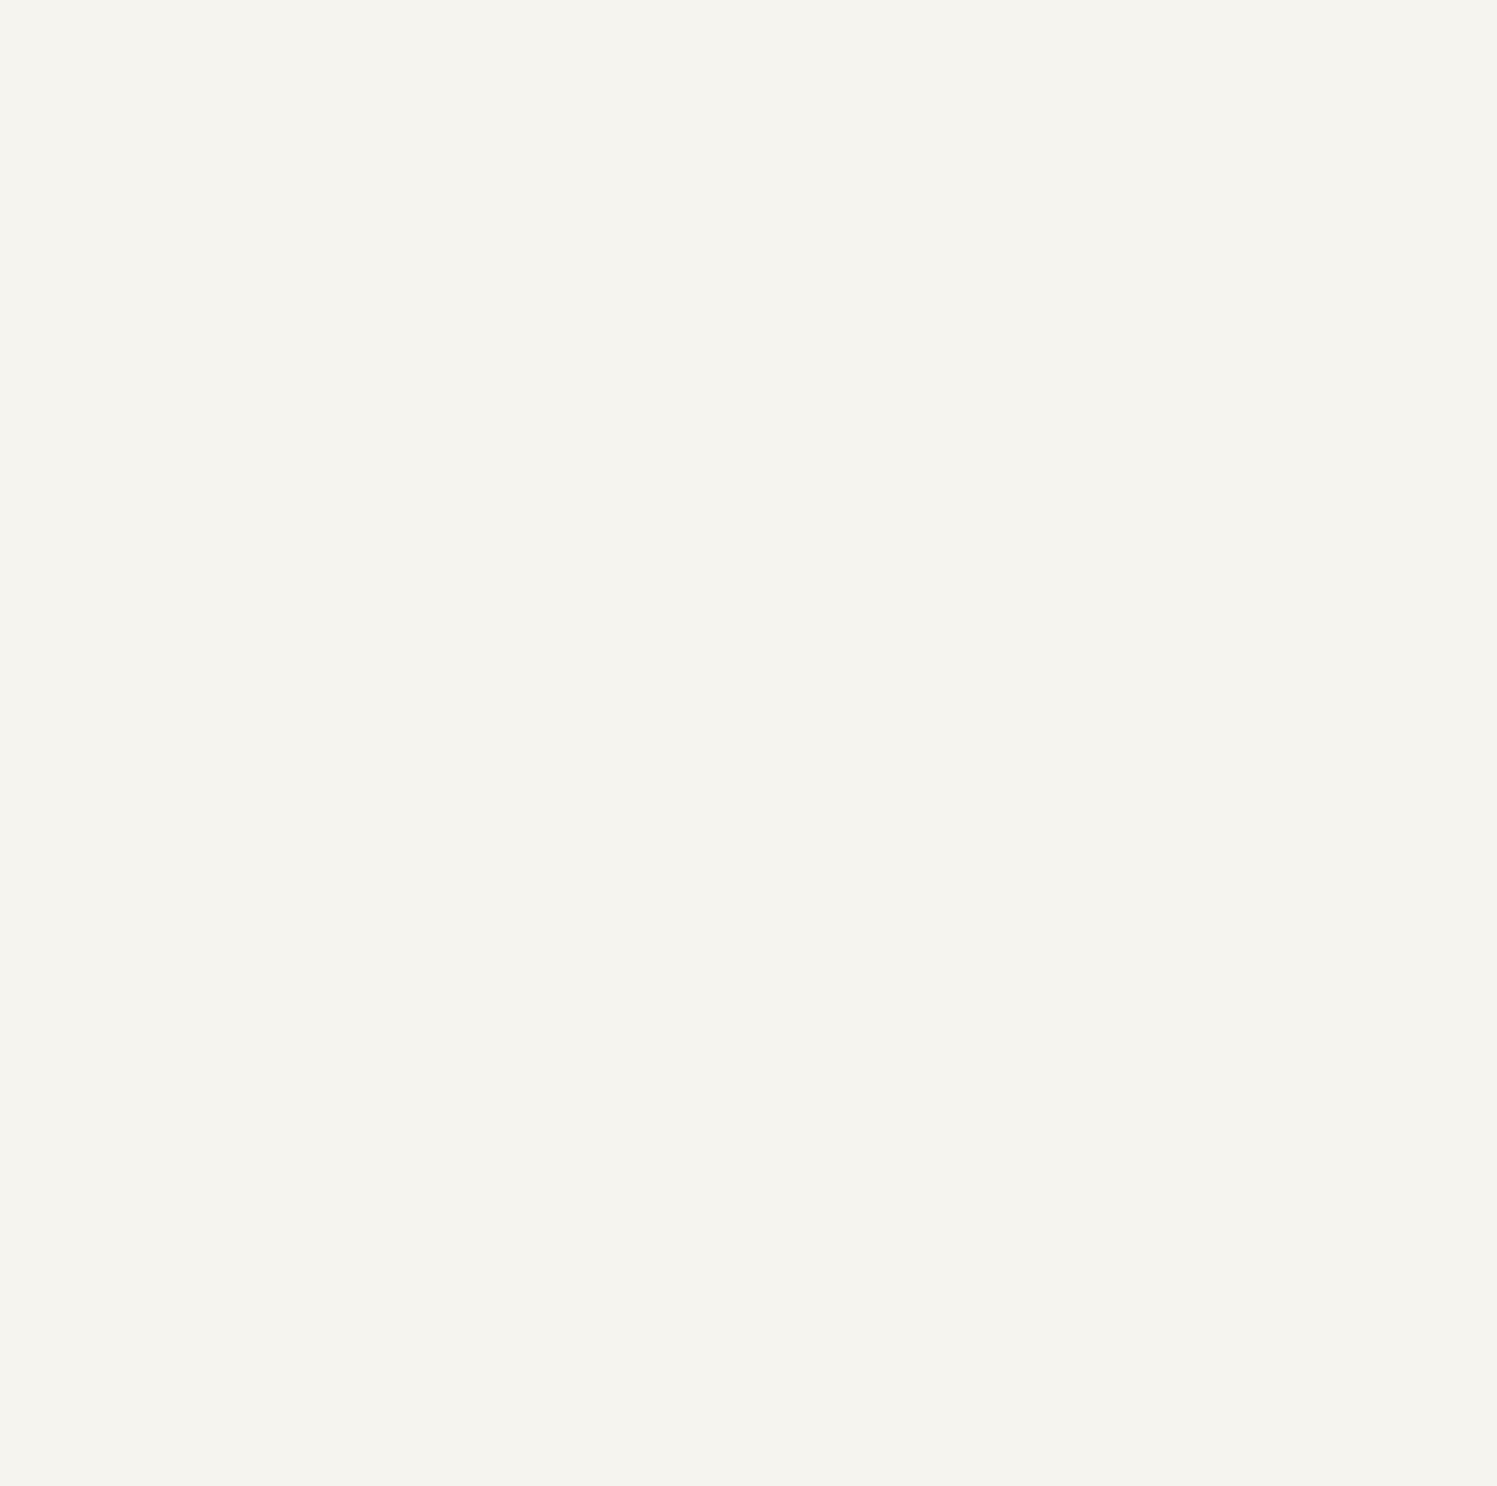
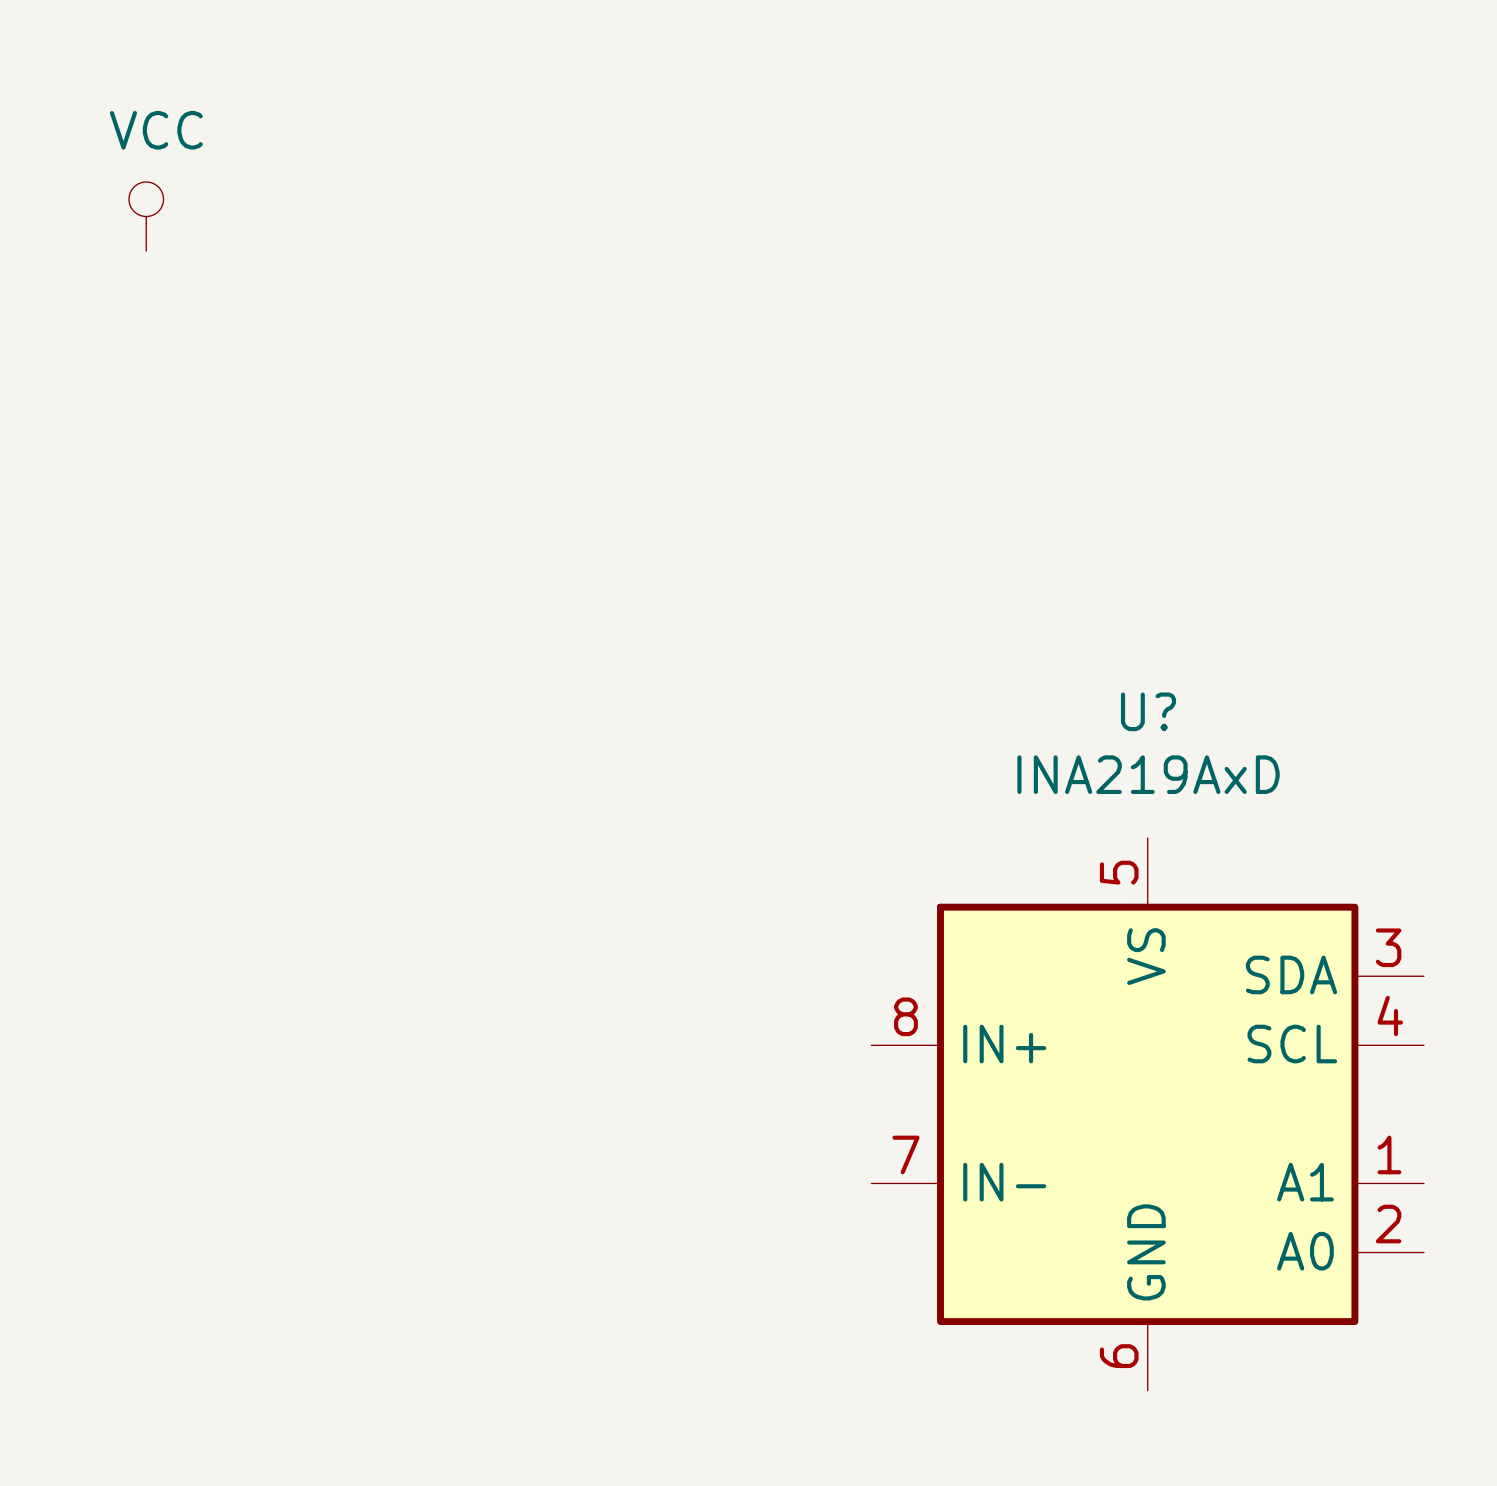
power symbol: none -> VCC (146, 216)
U?: none -> INA219AxD (1147, 1114)

